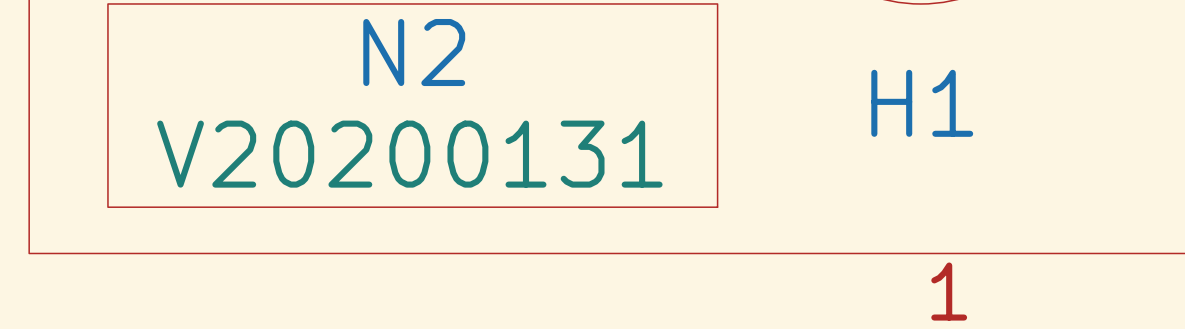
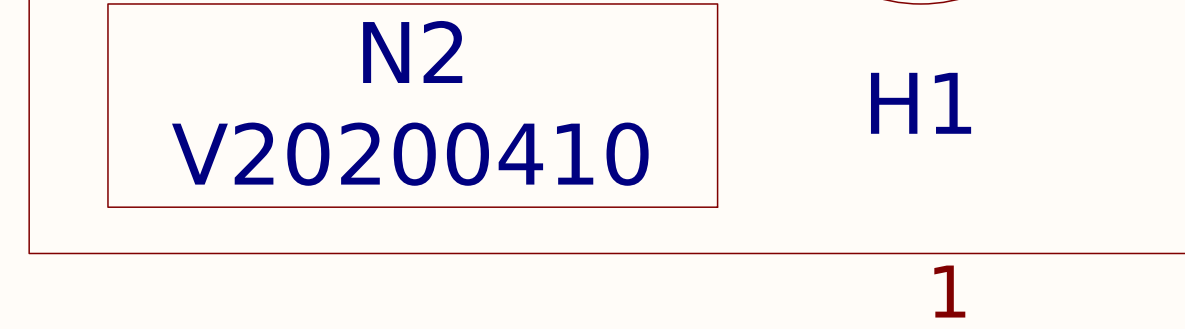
N2 value: V20200131 (409, 154) -> V20200410 (410, 154)

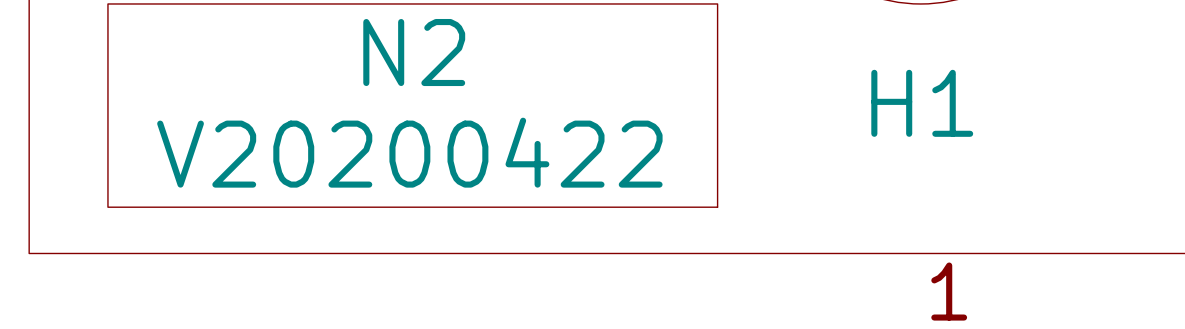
N2 value: V20200410 (410, 154) -> V20200422 (409, 152)

